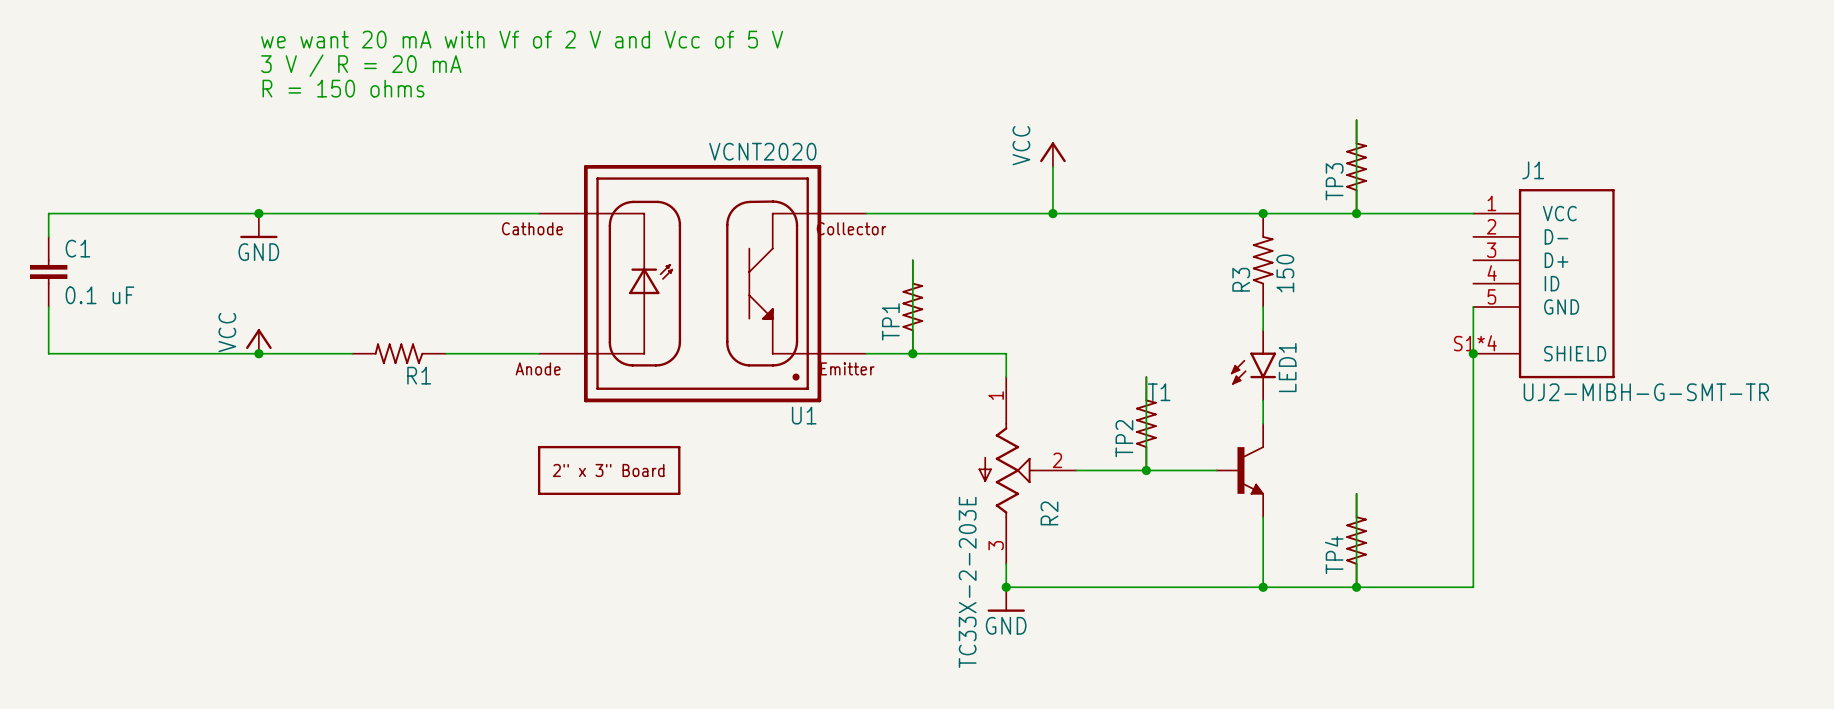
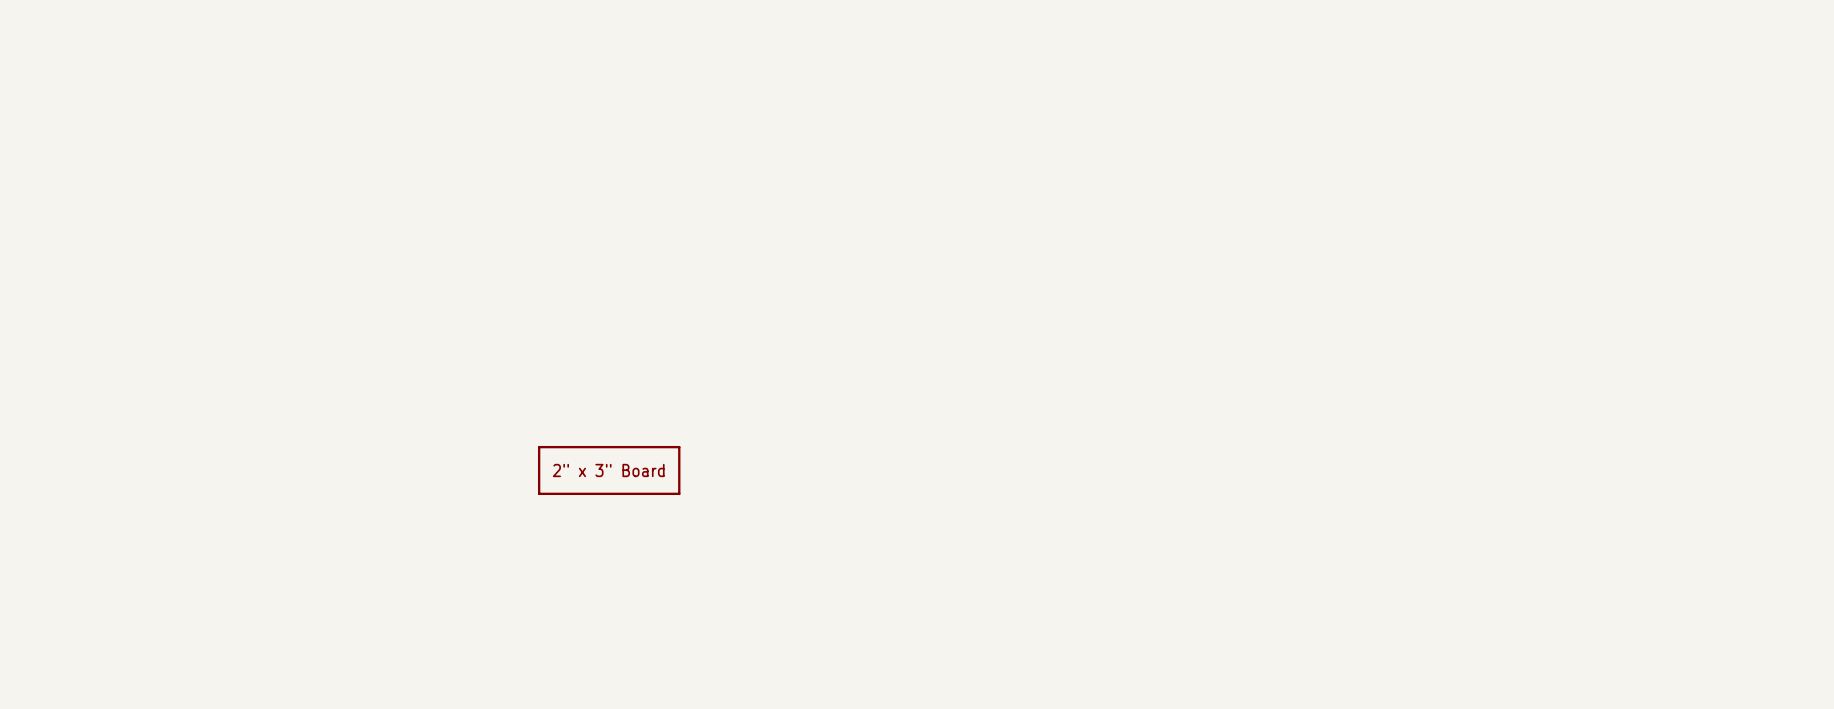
text: we want 20 mA with Vf of 2 V and Vcc of 5 V (522, 39) -> none
text: 3 V / R = 20 mA (361, 65) -> none
text: R = 150 ohms (343, 88) -> none
wire: (1356, 120) (1356, 213) -> none
power symbol: VCC (1052, 154) -> none
wire: (1052, 166) (1052, 213) -> none
TP3: (1356, 166) -> none
junction: (258, 213) -> none
wire: (539, 213) (48, 213) (48, 236) -> none
wire: (866, 213) (1473, 213) -> none
junction: (1052, 213) -> none
junction: (1263, 213) -> none
junction: (1356, 213) -> none
power symbol: GND (258, 225) -> none
wire: (912, 260) (912, 353) -> none
R3: 150 (1263, 260) -> none
C1: 0.1 uF (48, 271) -> none
U1: VCNT2020 (702, 283) -> none
J1: UJ2-MIBH-G-SMT-TR (1544, 283) -> none
wire: (48, 307) (48, 353) (352, 353) -> none
TP1: (912, 307) -> none
wire: (1263, 307) (1263, 330) -> none
wire: (1473, 307) (1473, 587) (1006, 587) (1006, 563) -> none
power symbol: VCC (258, 341) -> none
junction: (258, 353) -> none
R1: (399, 353) -> none
wire: (445, 353) (539, 353) -> none
wire: (866, 353) (1006, 353) (1006, 377) -> none
junction: (912, 353) -> none
junction: (1473, 353) -> none
LED1: (1253, 365) -> none
wire: (1146, 377) (1146, 470) -> none
wire: (1263, 400) (1263, 423) -> none
TP2: (1146, 423) -> none
R2: TC33X-2-203E (1027, 470) -> none
wire: (1076, 470) (1216, 470) -> none
junction: (1146, 470) -> none
T1: (1240, 470) -> none
wire: (1356, 493) (1356, 587) -> none
wire: (1263, 517) (1263, 587) -> none
TP4: (1356, 540) -> none
junction: (1006, 587) -> none
junction: (1263, 587) -> none
junction: (1356, 587) -> none
power symbol: GND (1006, 599) -> none

